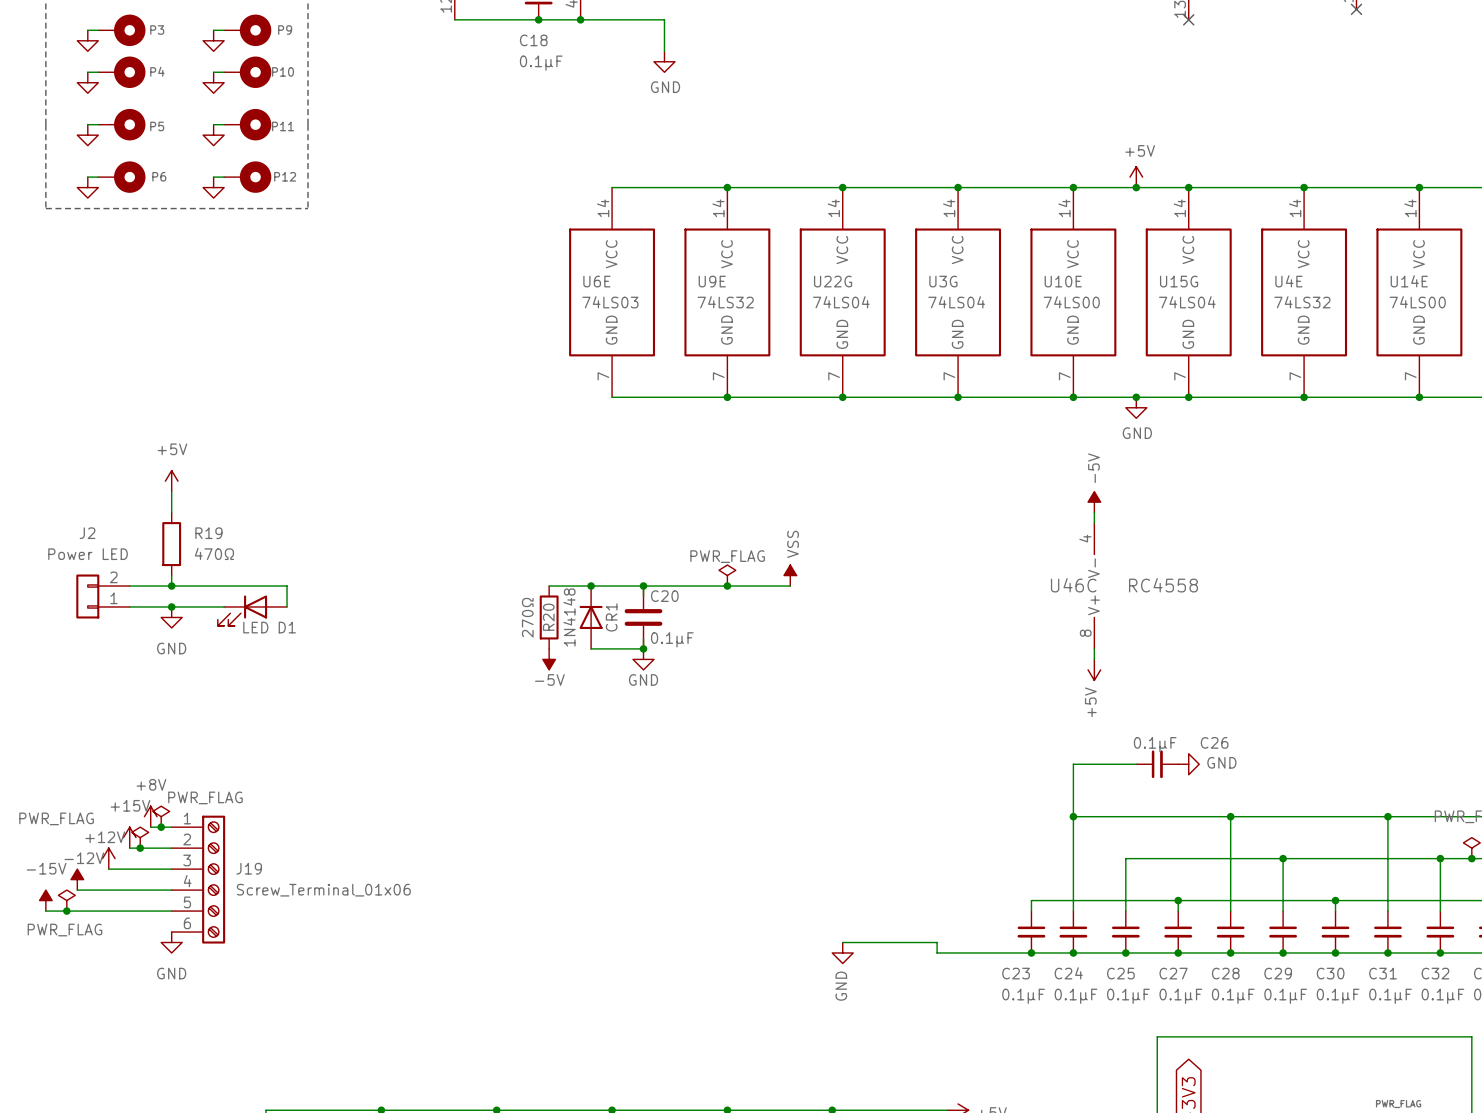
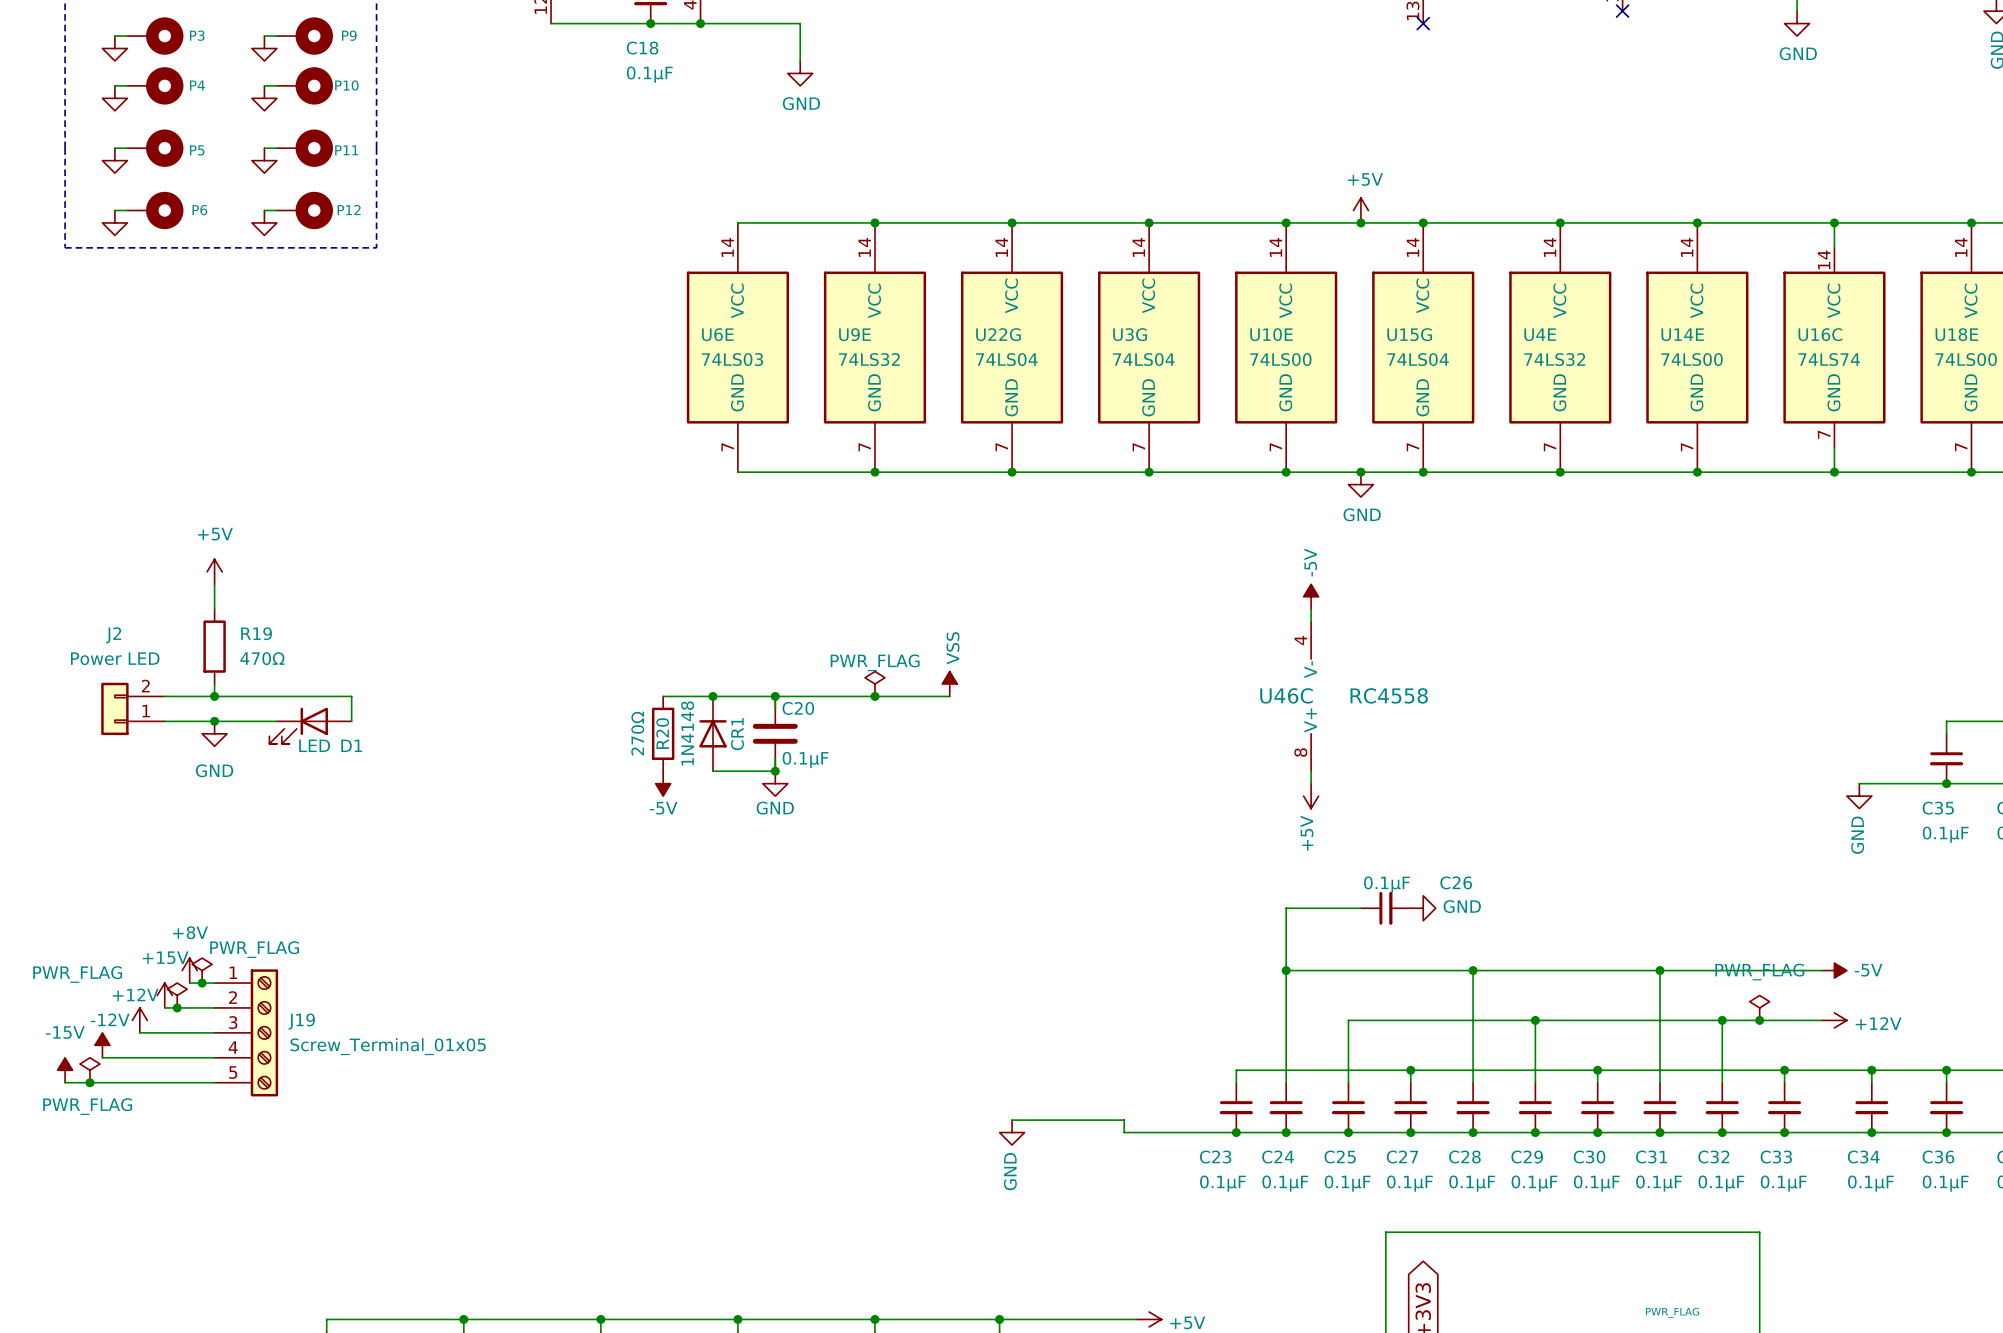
J19 symbol: [171, 815, 226, 944] -> [214, 969, 279, 1097]
J19 value: Screw_Terminal_01x06 (323, 890) -> Screw_Terminal_01x05 (388, 1046)
power symbol: GND (171, 942) -> none

